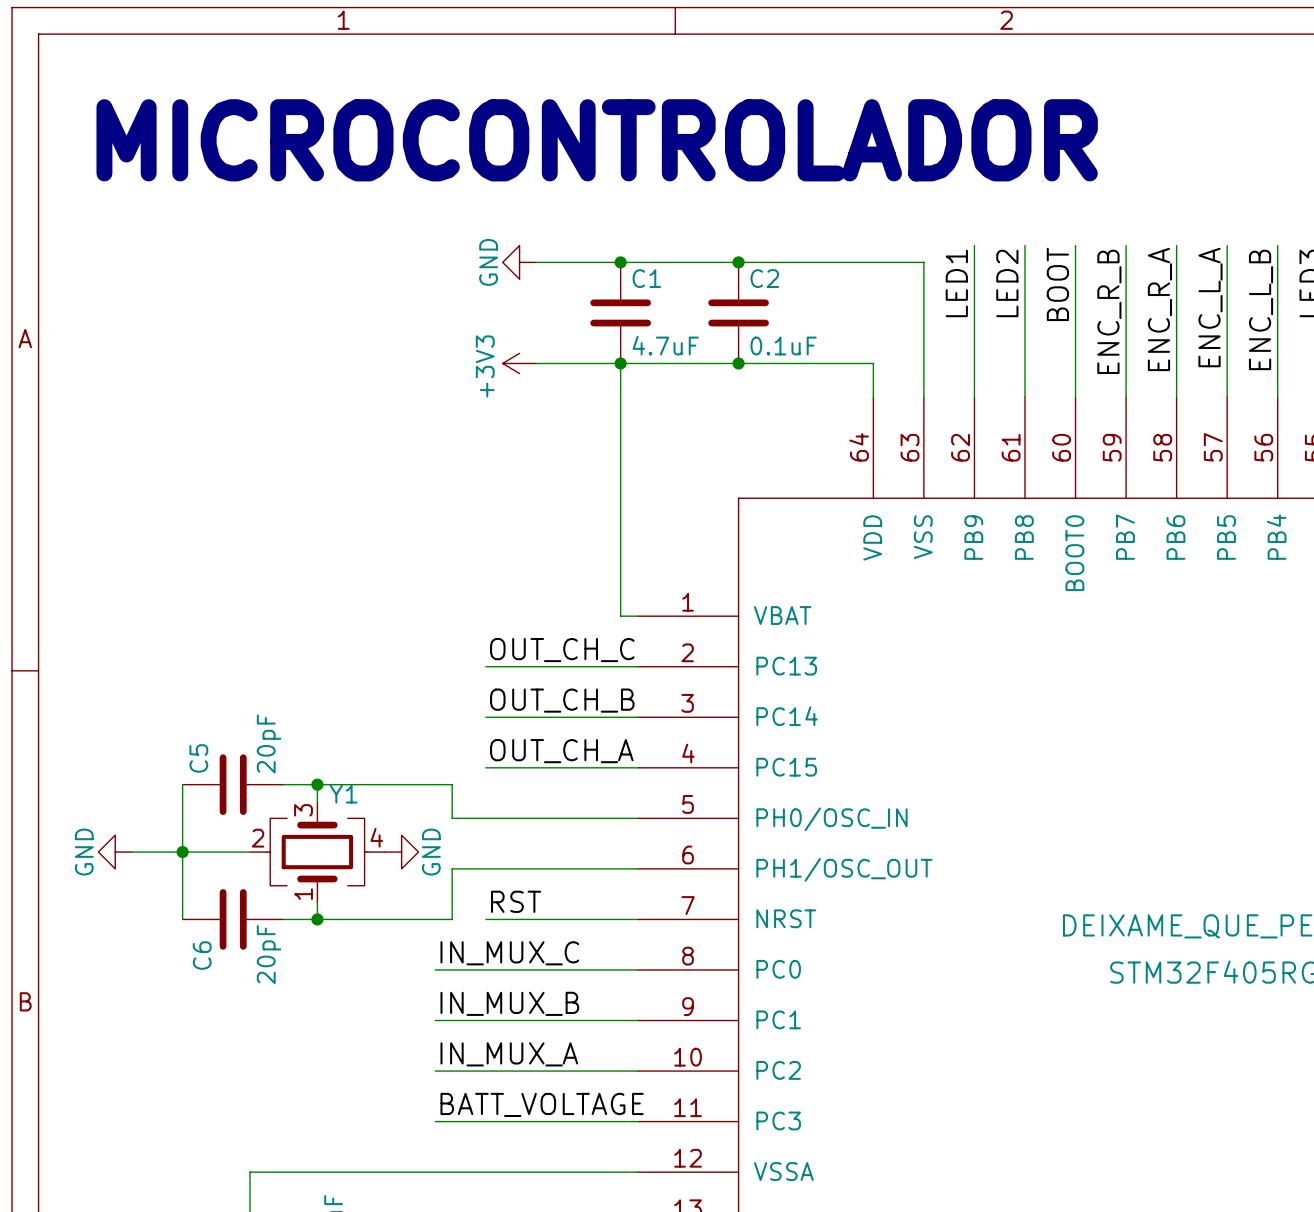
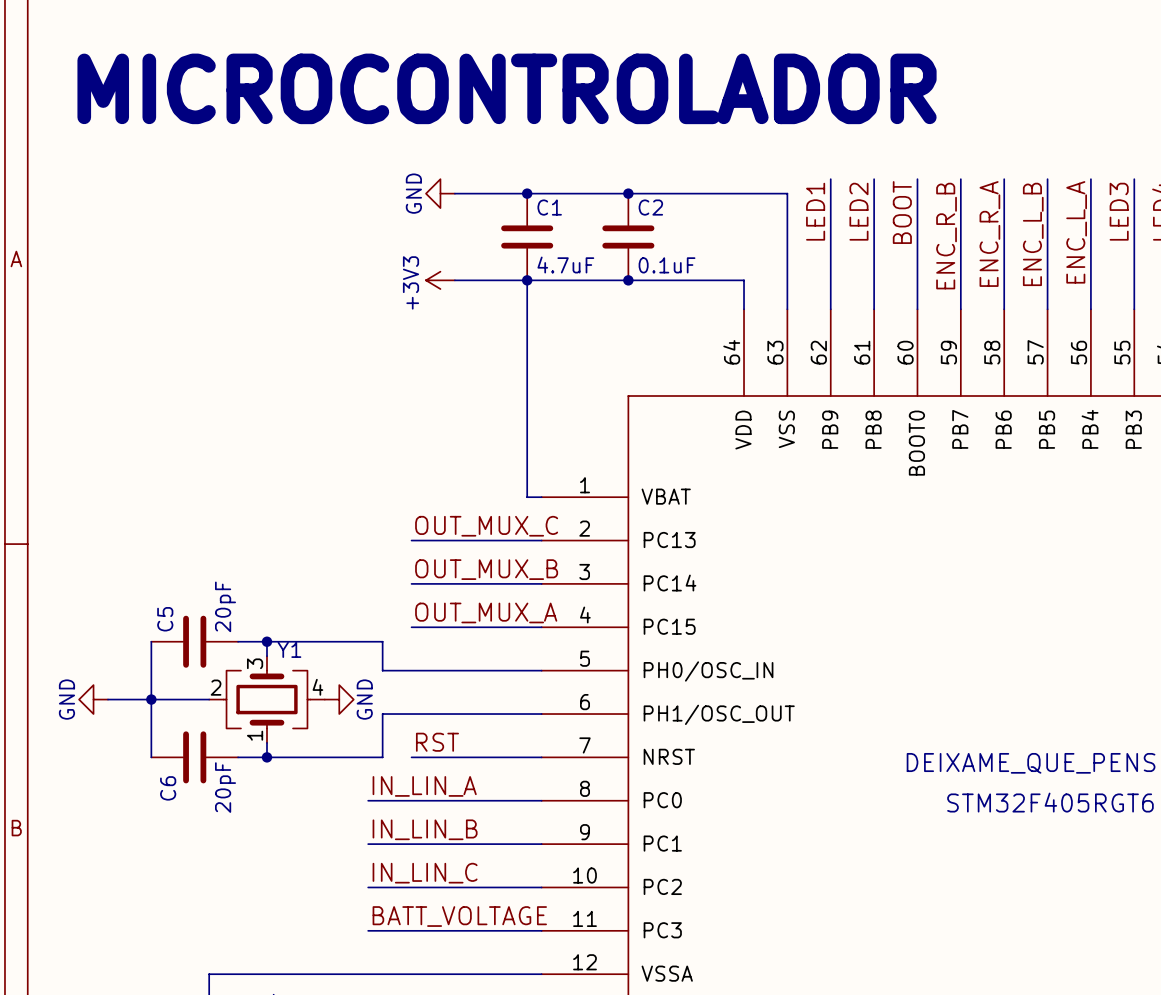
label: ENC_L_A (1210, 307) -> ENC_L_B (1033, 234)
label: ENC_L_B (1261, 309) -> ENC_L_A (1076, 232)
label: OUT_CH_C (562, 650) -> OUT_MUX_C (486, 526)
label: OUT_CH_B (562, 700) -> OUT_MUX_B (486, 569)
label: OUT_CH_A (561, 751) -> OUT_MUX_A (486, 612)
label: IN_MUX_C (509, 953) -> IN_LIN_A (424, 786)
label: IN_MUX_B (509, 1003) -> IN_LIN_B (425, 829)
label: IN_MUX_A (509, 1054) -> IN_LIN_C (425, 873)

